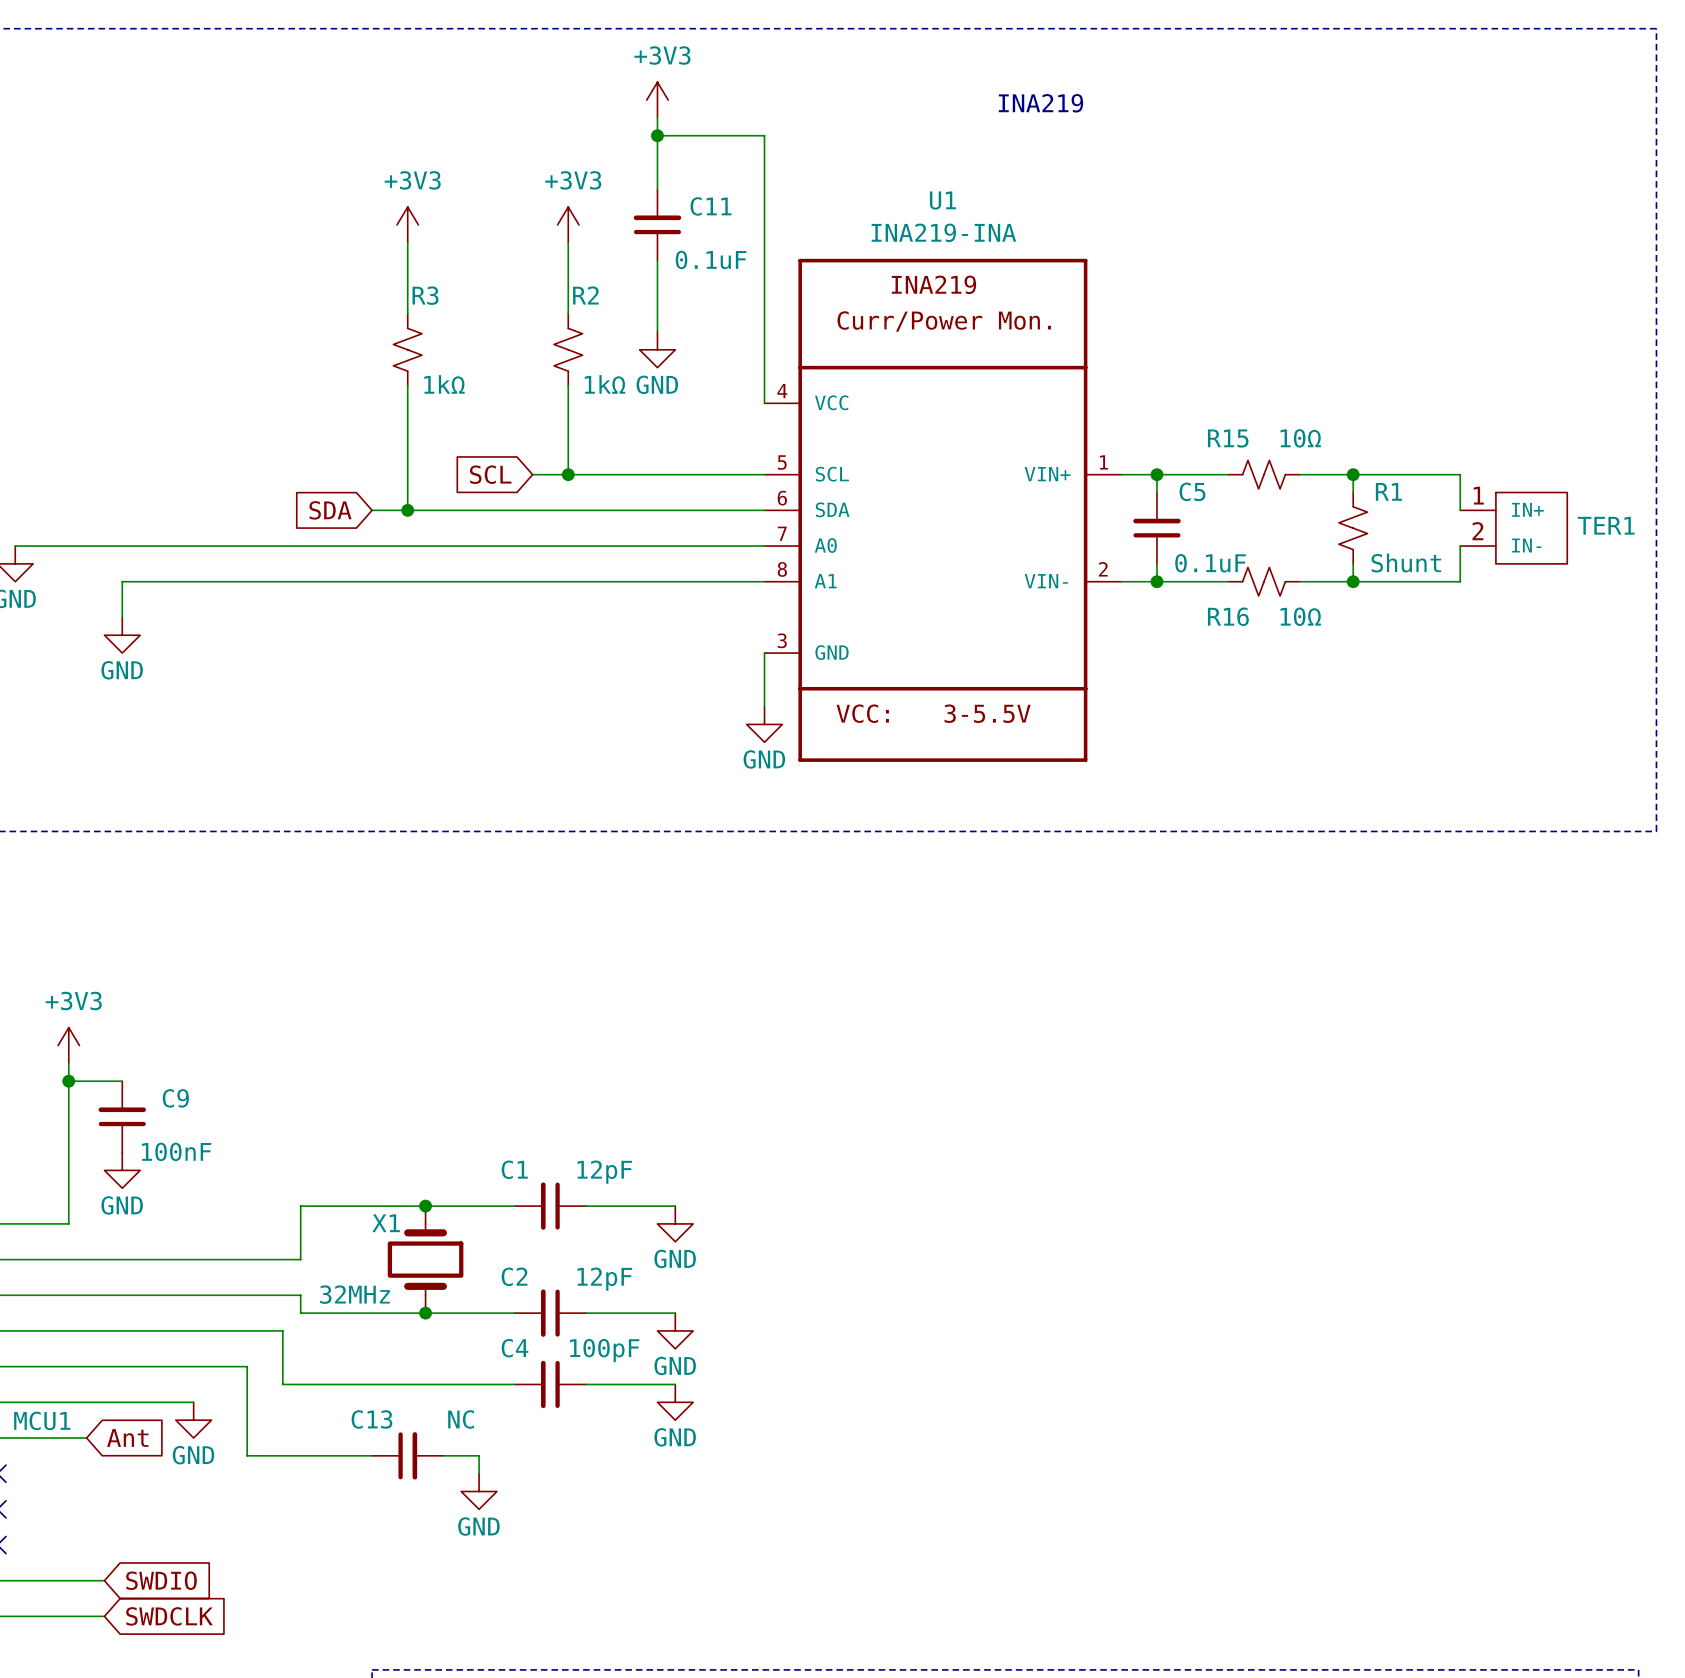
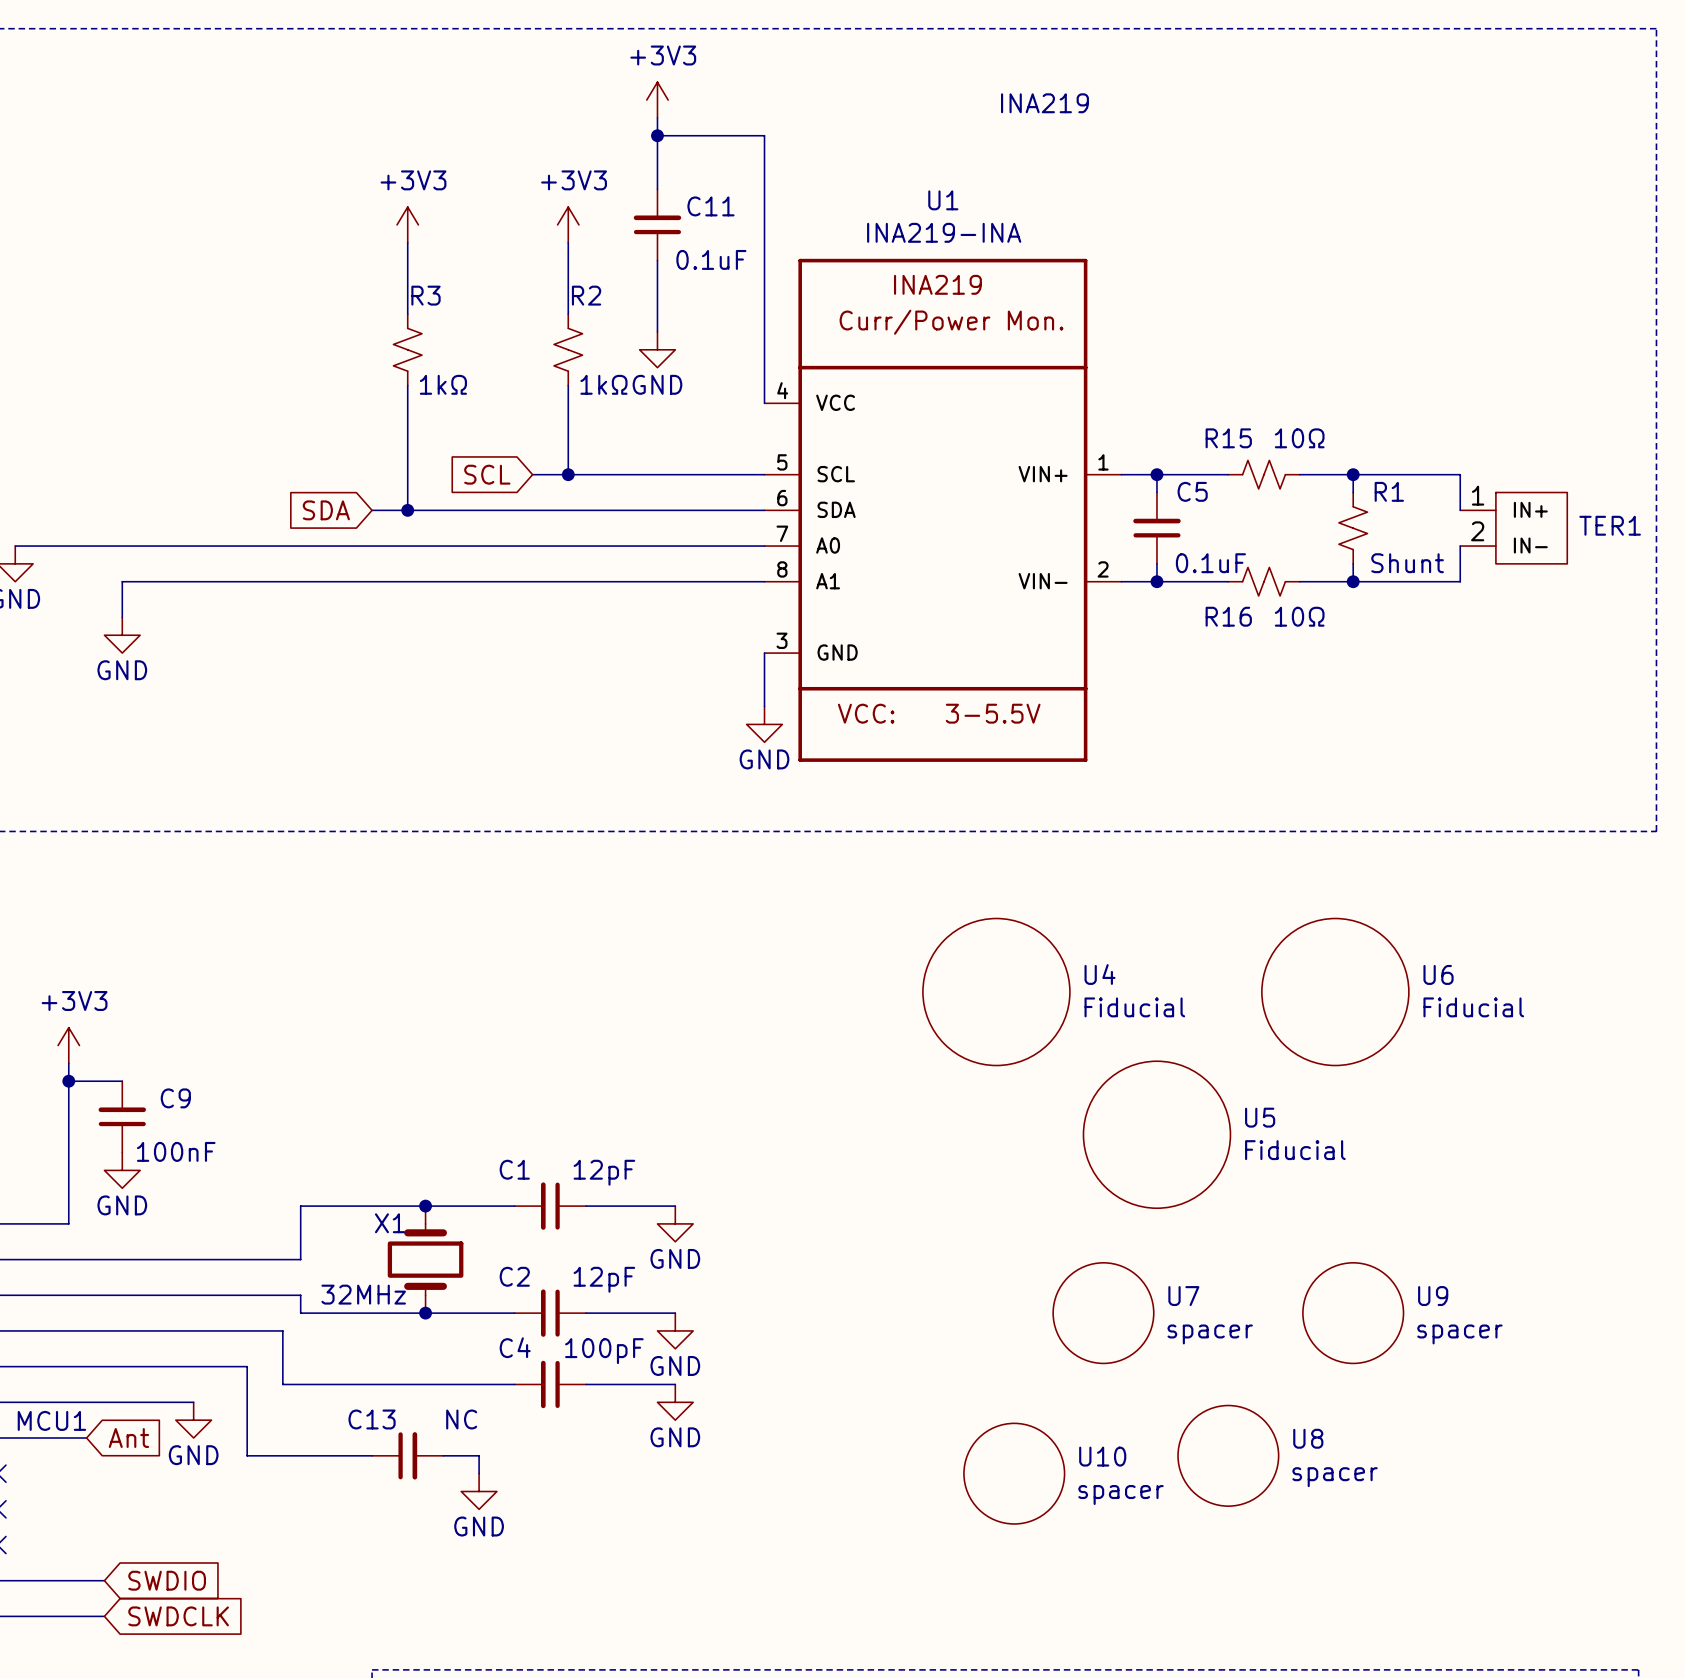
U4: none -> Fiducial (996, 992)
U6: none -> Fiducial (1335, 992)
U5: none -> Fiducial (1156, 1134)
U7: none -> spacer (1103, 1313)
U9: none -> spacer (1353, 1313)
U8: none -> spacer (1228, 1455)
U10: none -> spacer (1014, 1473)

